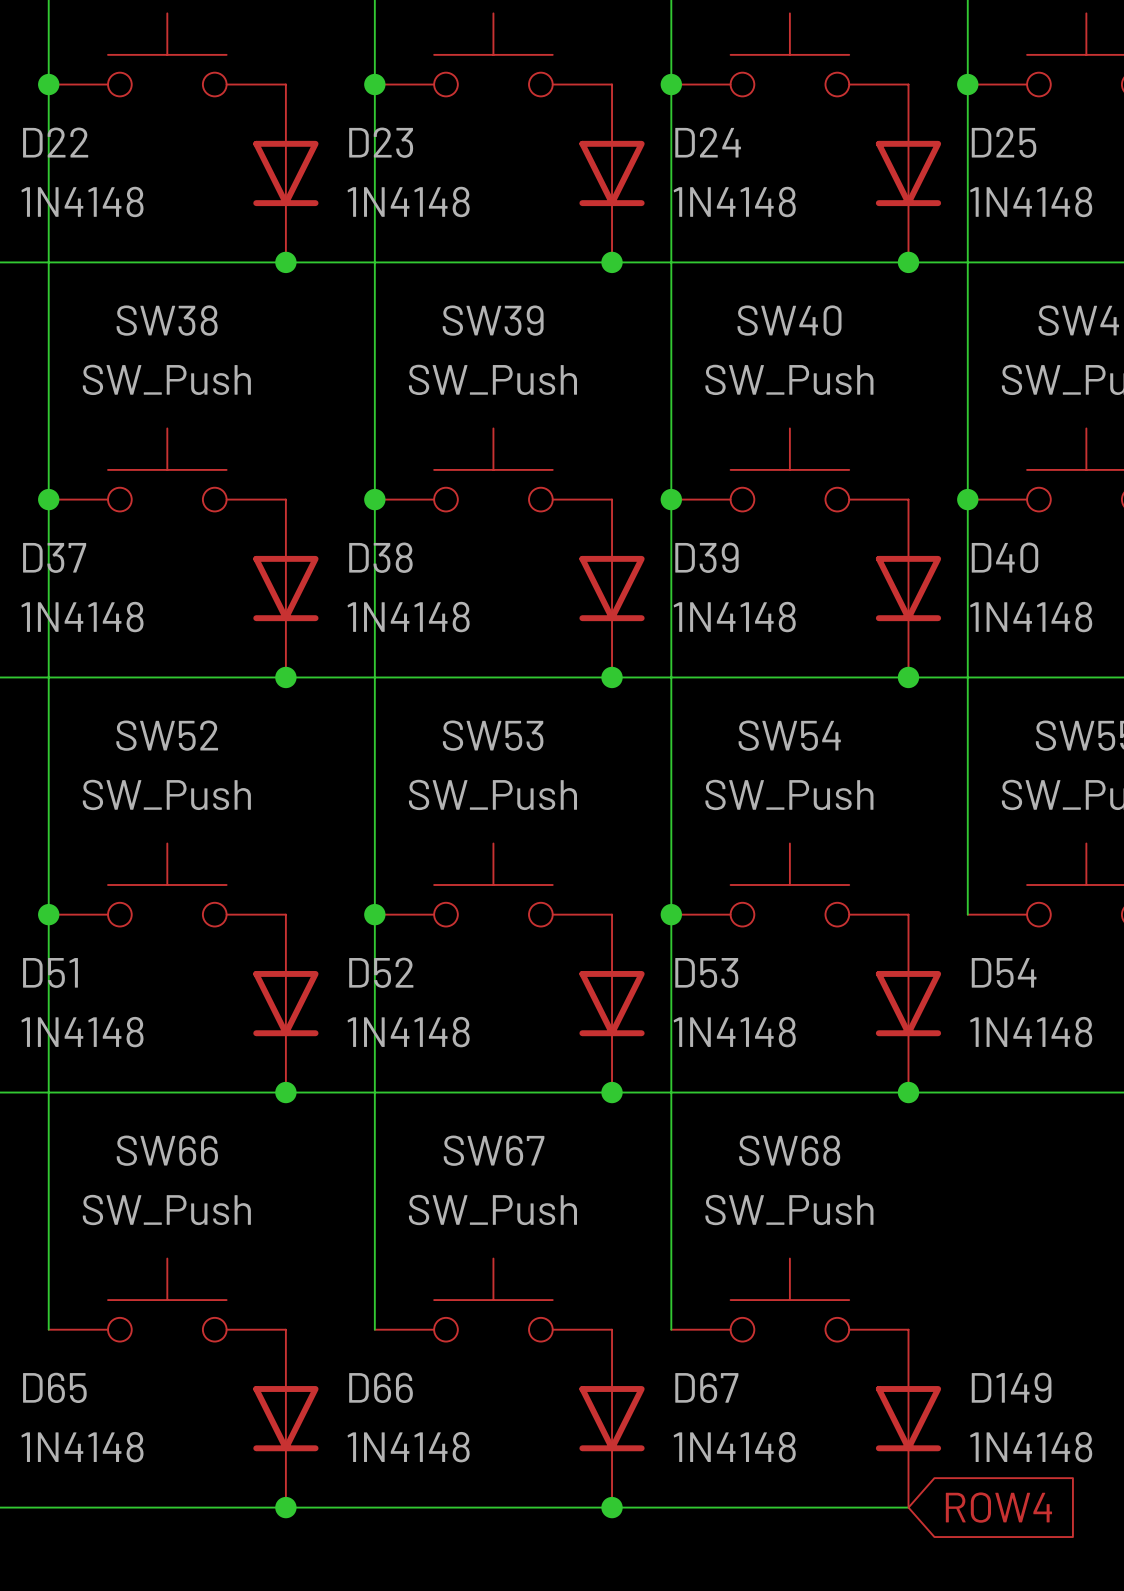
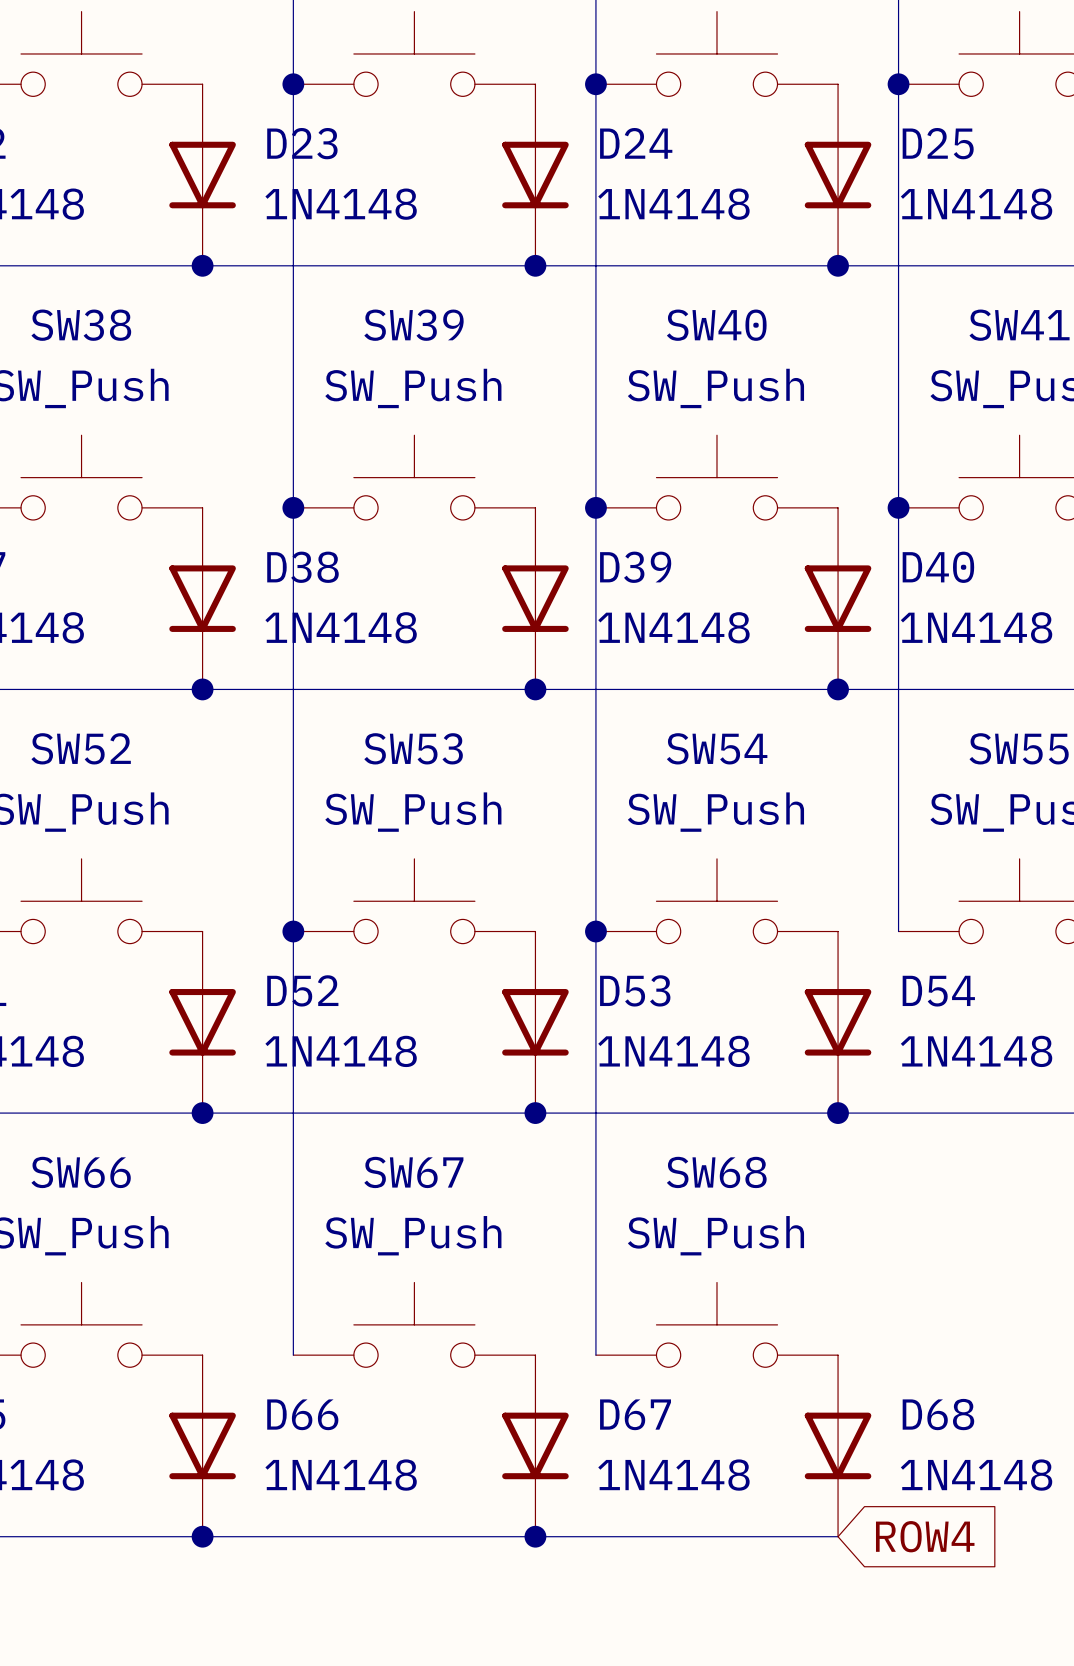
D149 name: D149 (1011, 1387) -> D68 (938, 1414)

